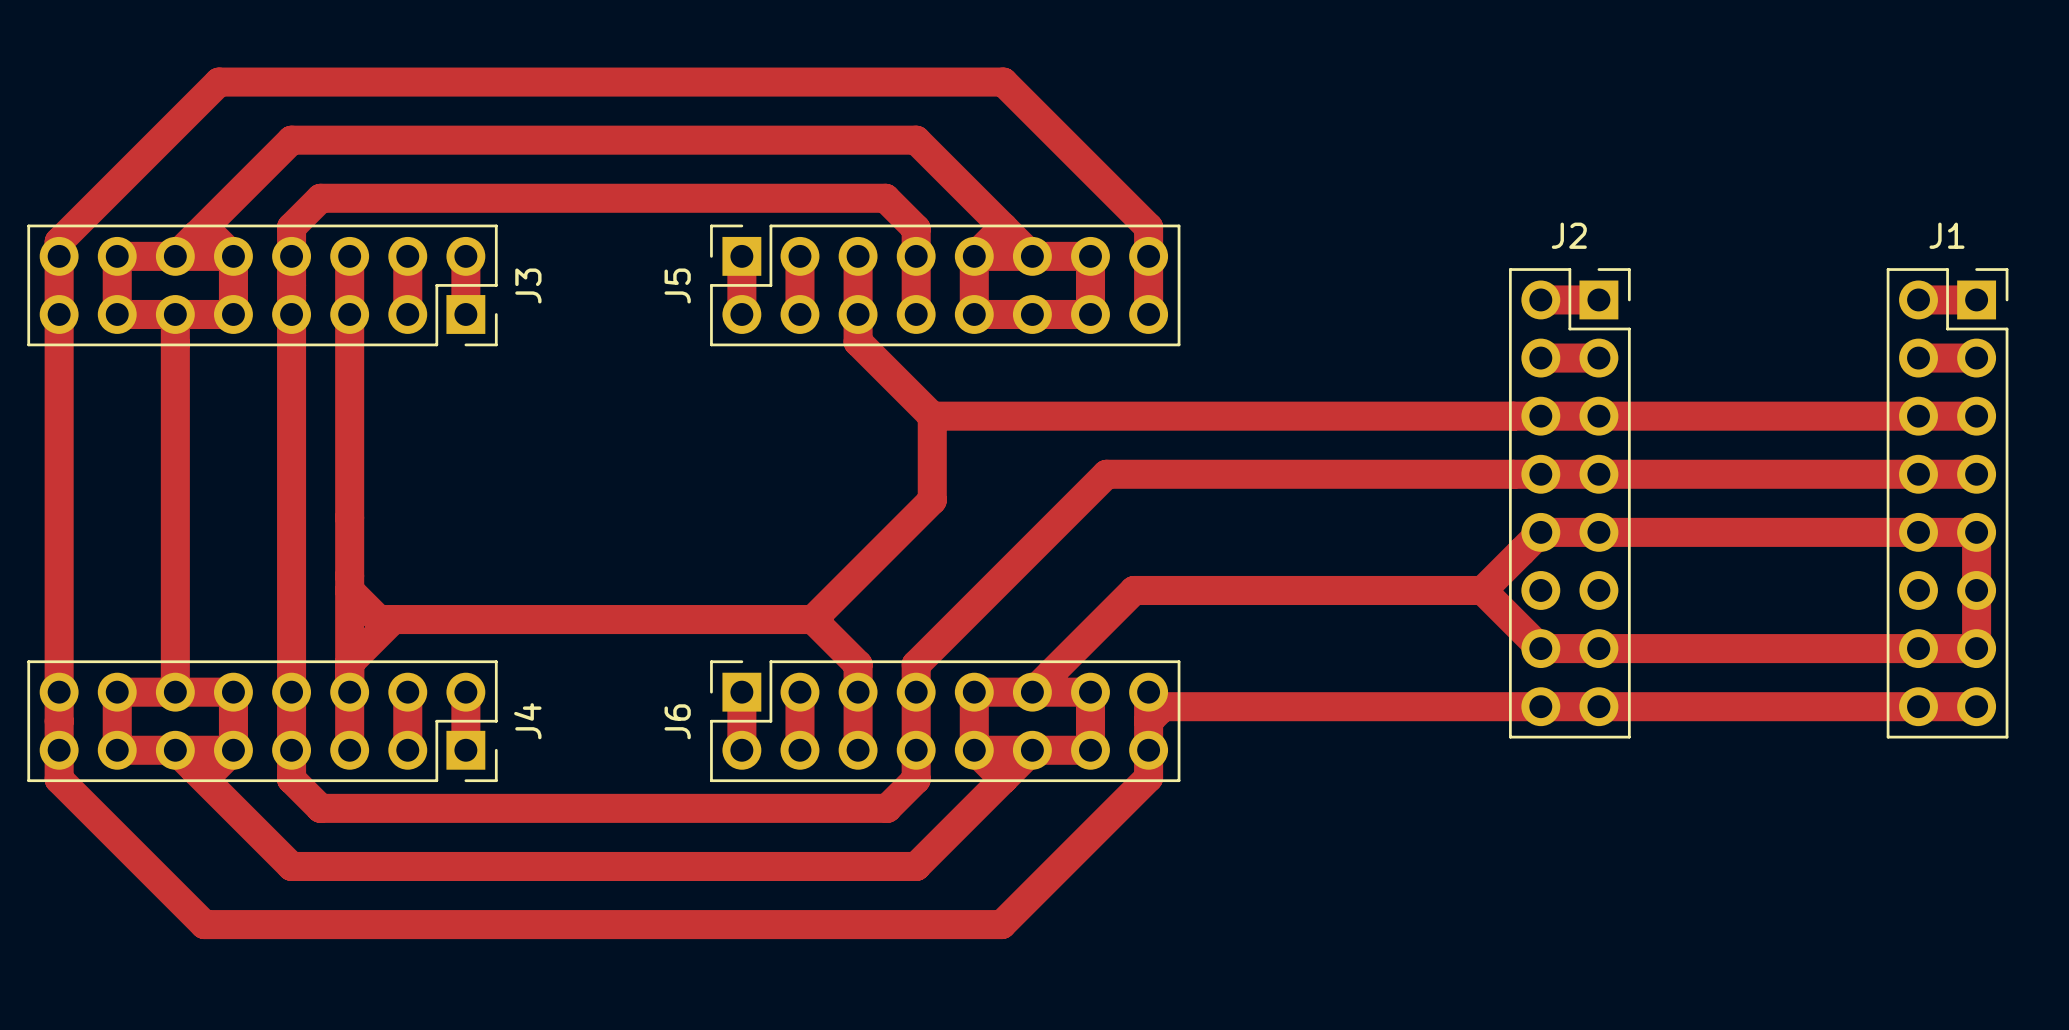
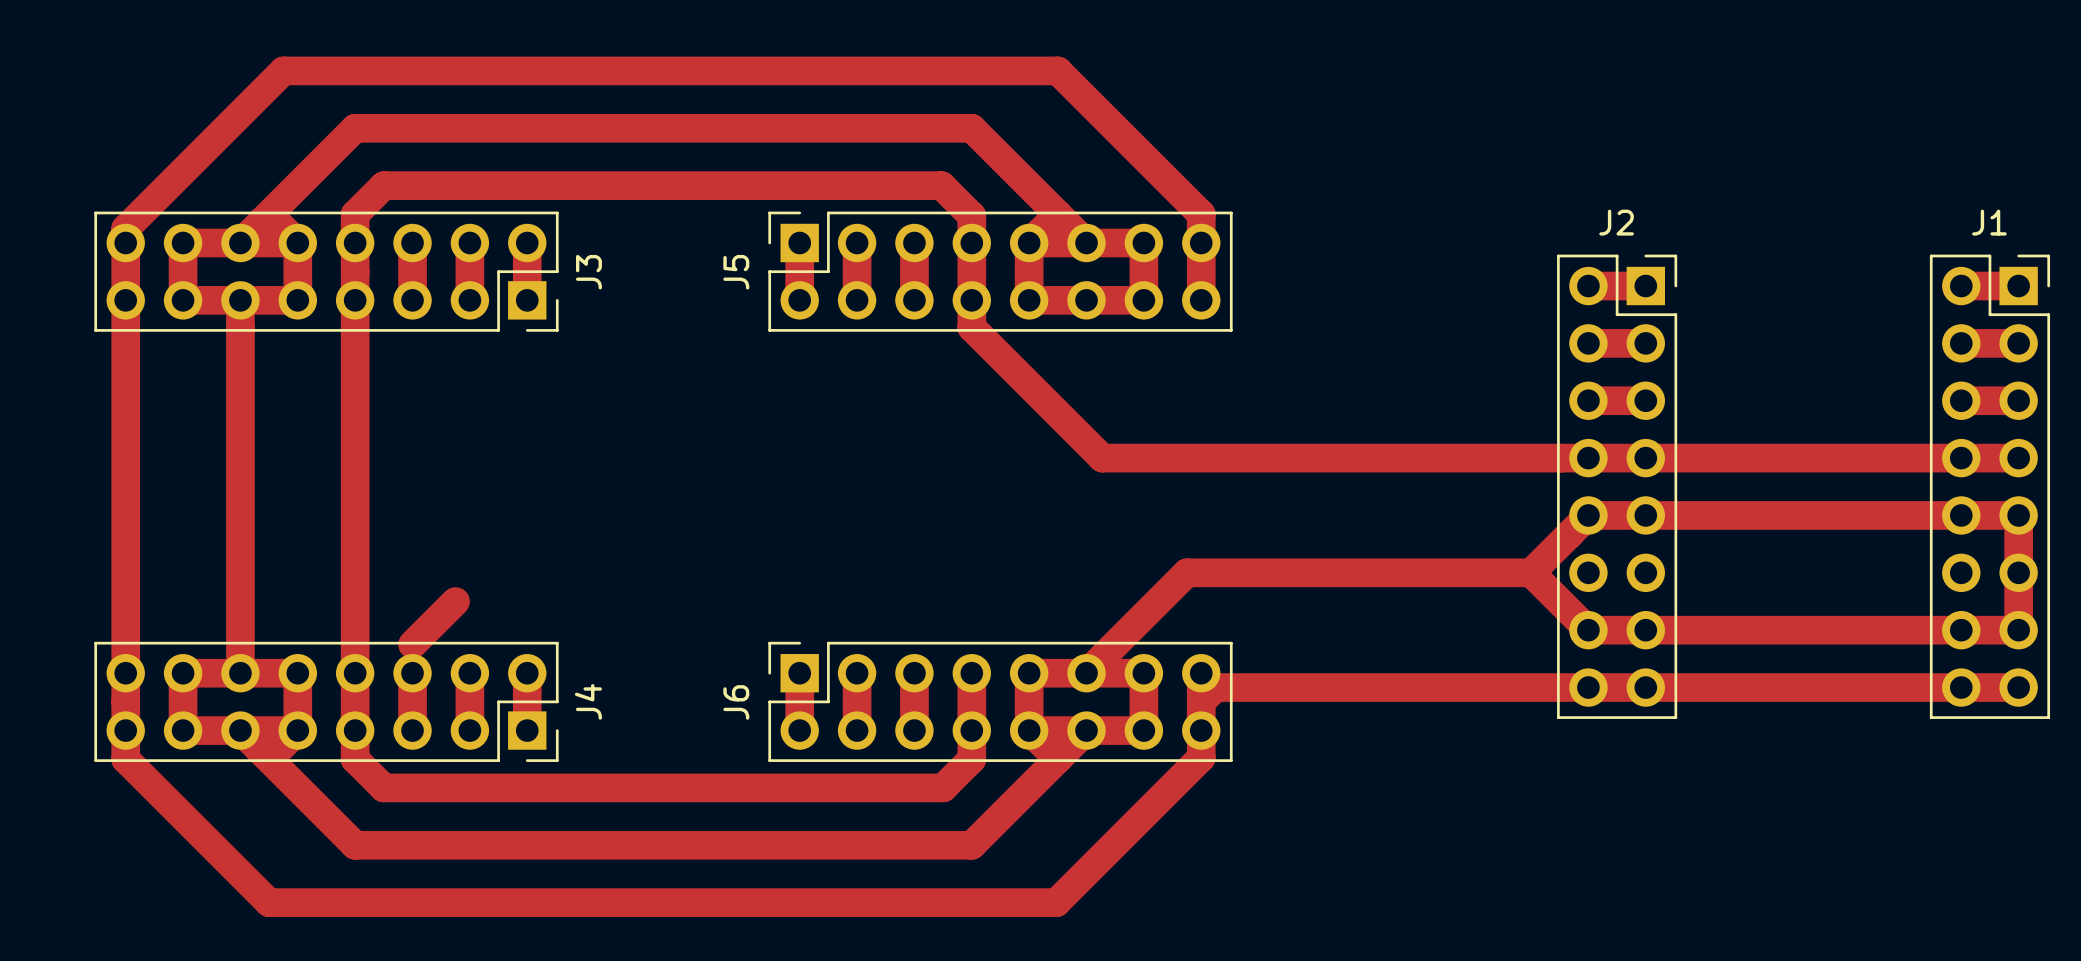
top track: (349, 314) (349, 692) -> none
top track: (858, 314) (858, 341) (932, 416) -> none
top track: (932, 416) (1540, 416) -> none
top track: (932, 416) (932, 500) (812, 619) -> none
top track: (1598, 416) (1918, 416) -> none
top track: (1106, 474) (916, 664) (916, 692) -> (1159, 458) (1102, 458) (971, 327) (971, 300)
top track: (349, 590) (378, 619) (812, 619) -> none
top track: (812, 619) (858, 664) (858, 692) -> none

